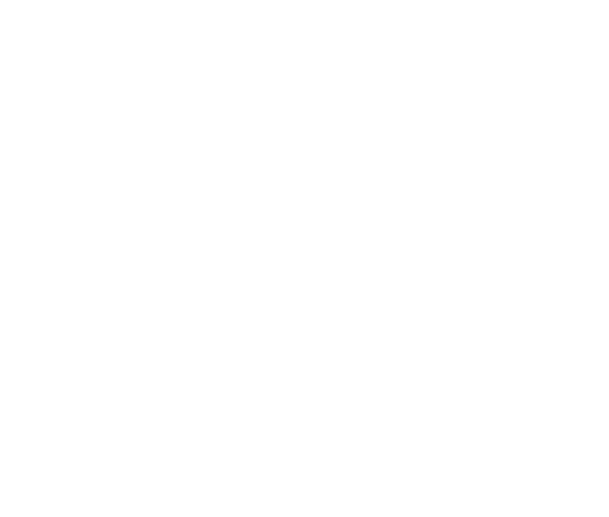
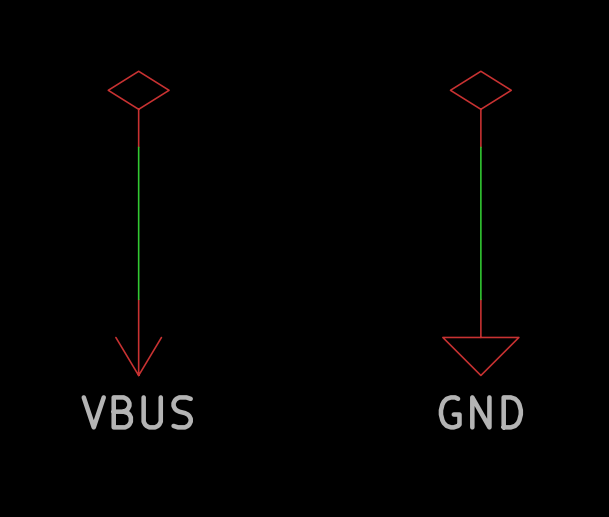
power symbol: none -> (138, 109)
power symbol: none -> (480, 109)
wire: none -> (138, 147) (138, 299)
wire: none -> (480, 147) (480, 299)
power symbol: none -> VBUS (138, 337)
power symbol: none -> GND (480, 337)

